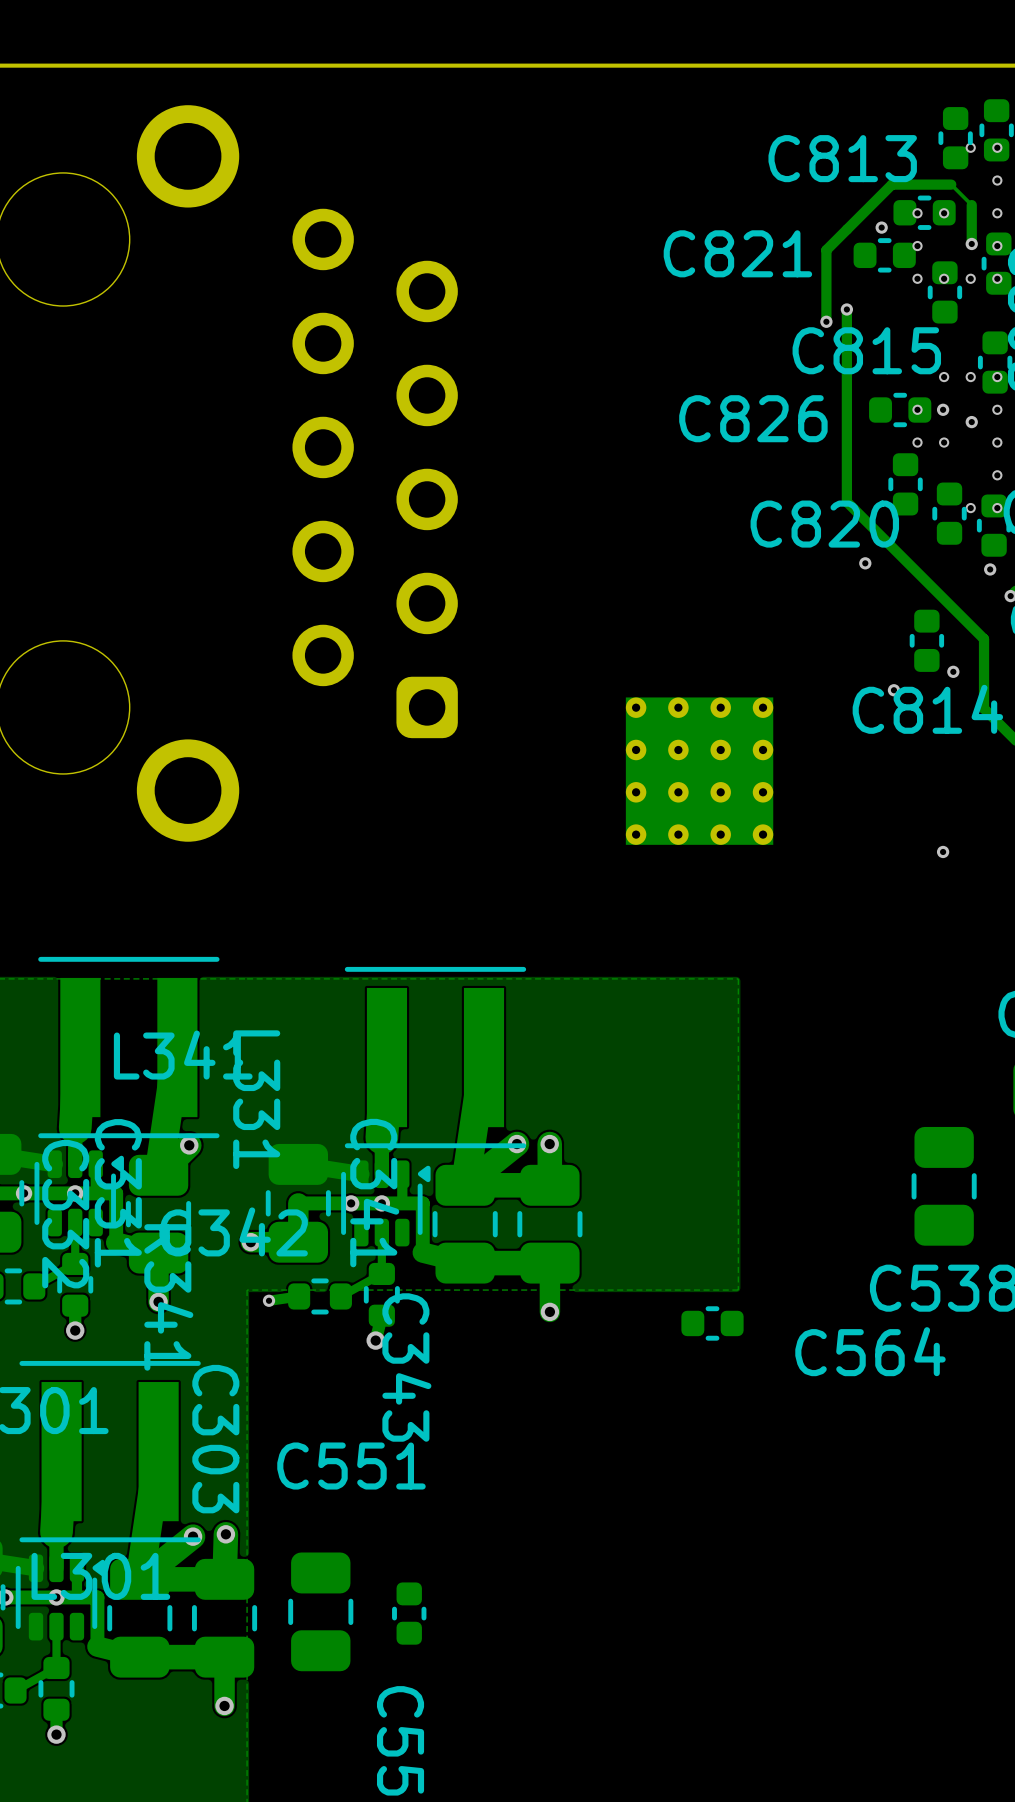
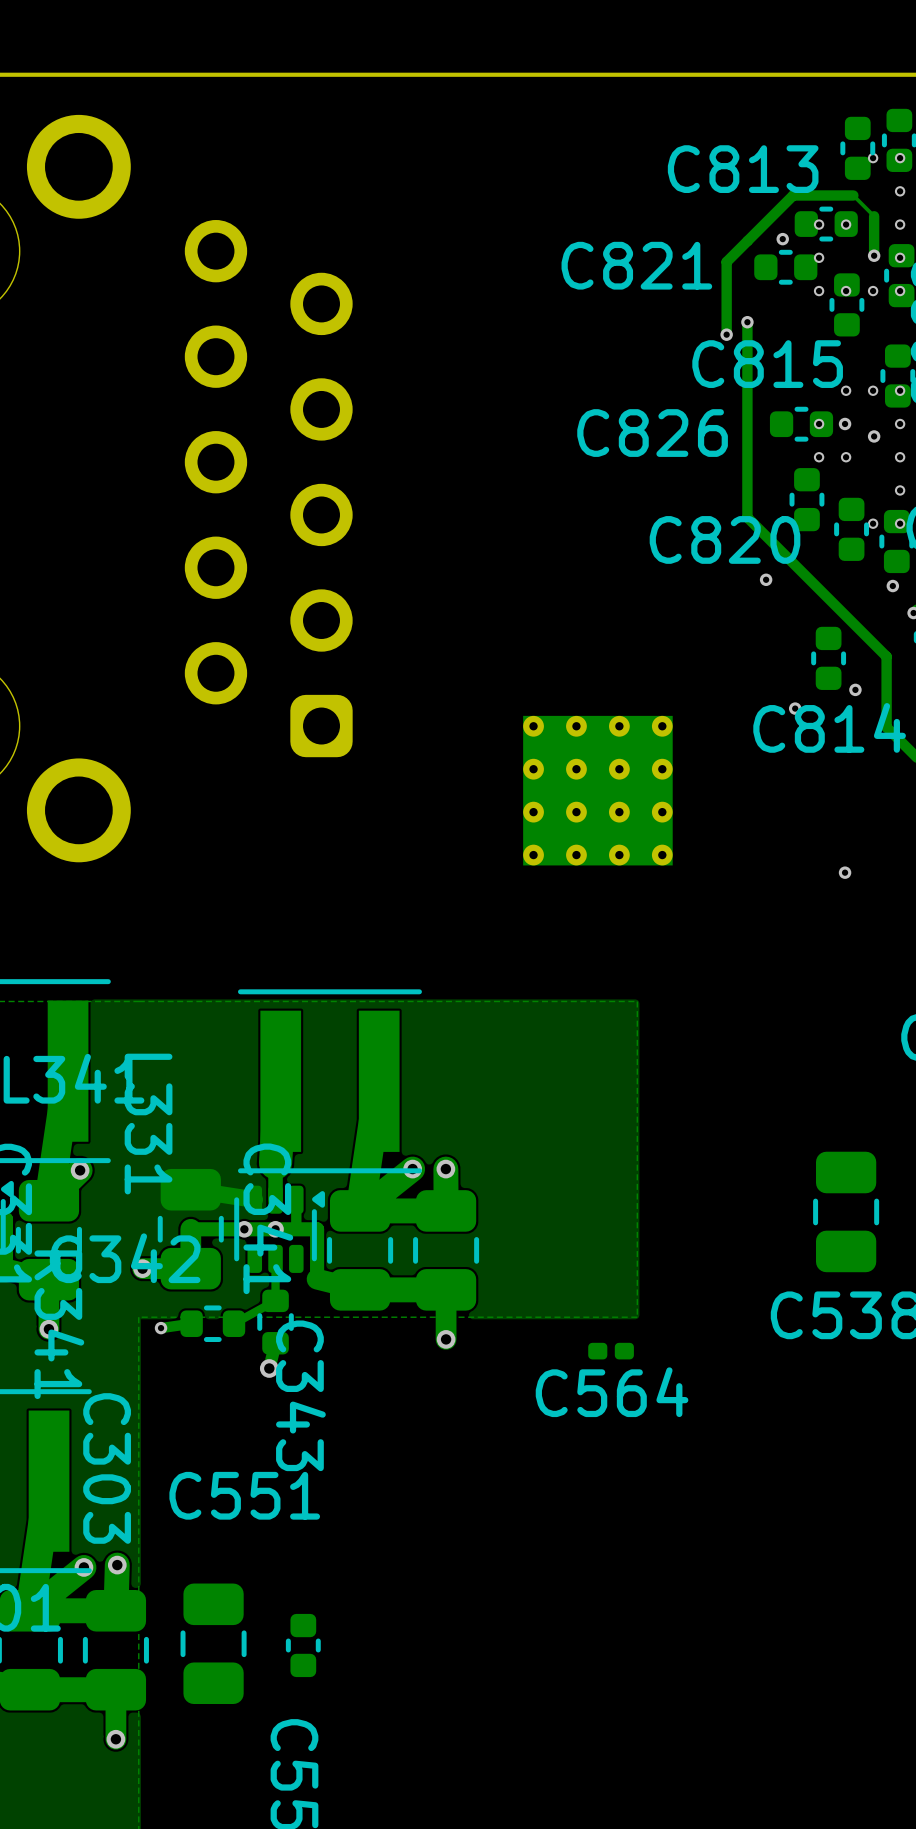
C564 footprint: [681, 1306, 744, 1341] -> [588, 1342, 634, 1360]
C564 name position: C564 (870, 1351) -> C564 (612, 1392)

